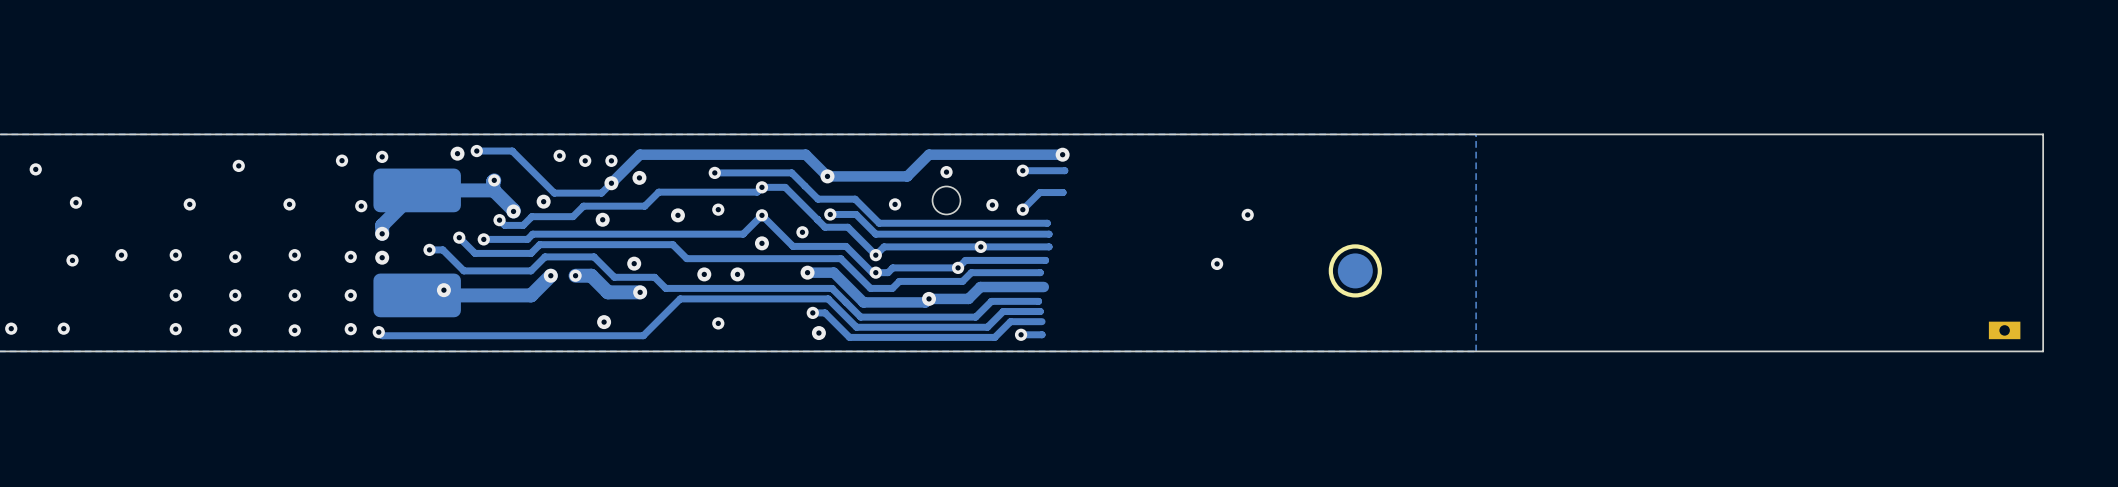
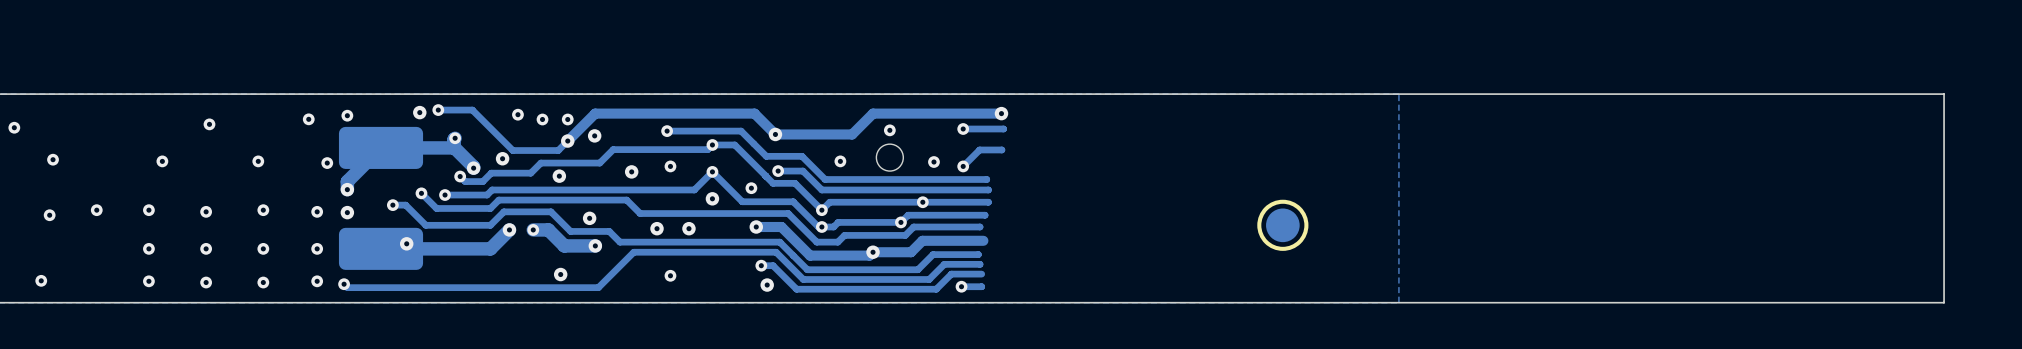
via: (1247, 214) -> none
via: (1217, 263) -> none
part: (2004, 330) -> none

